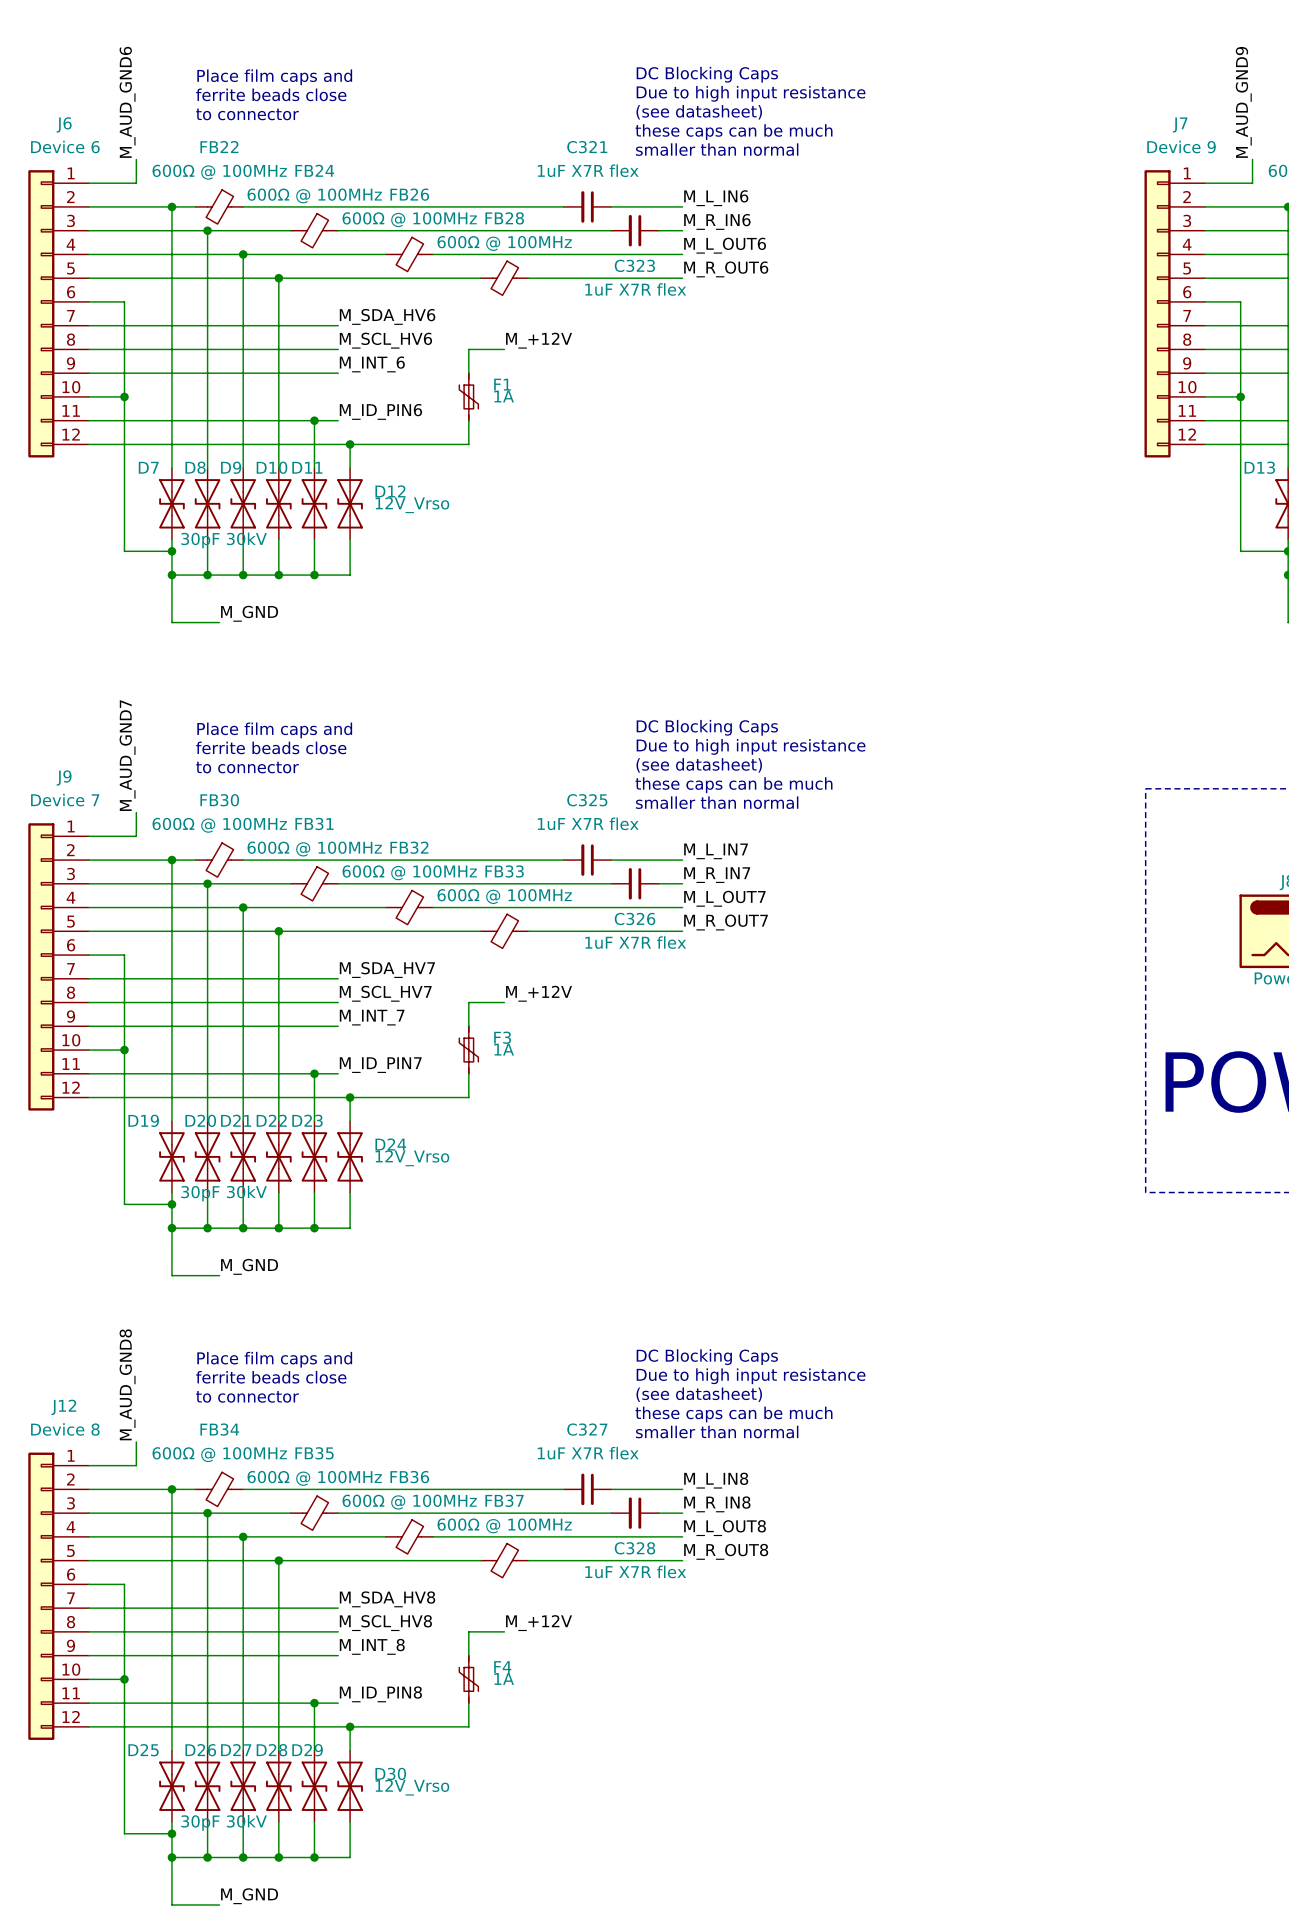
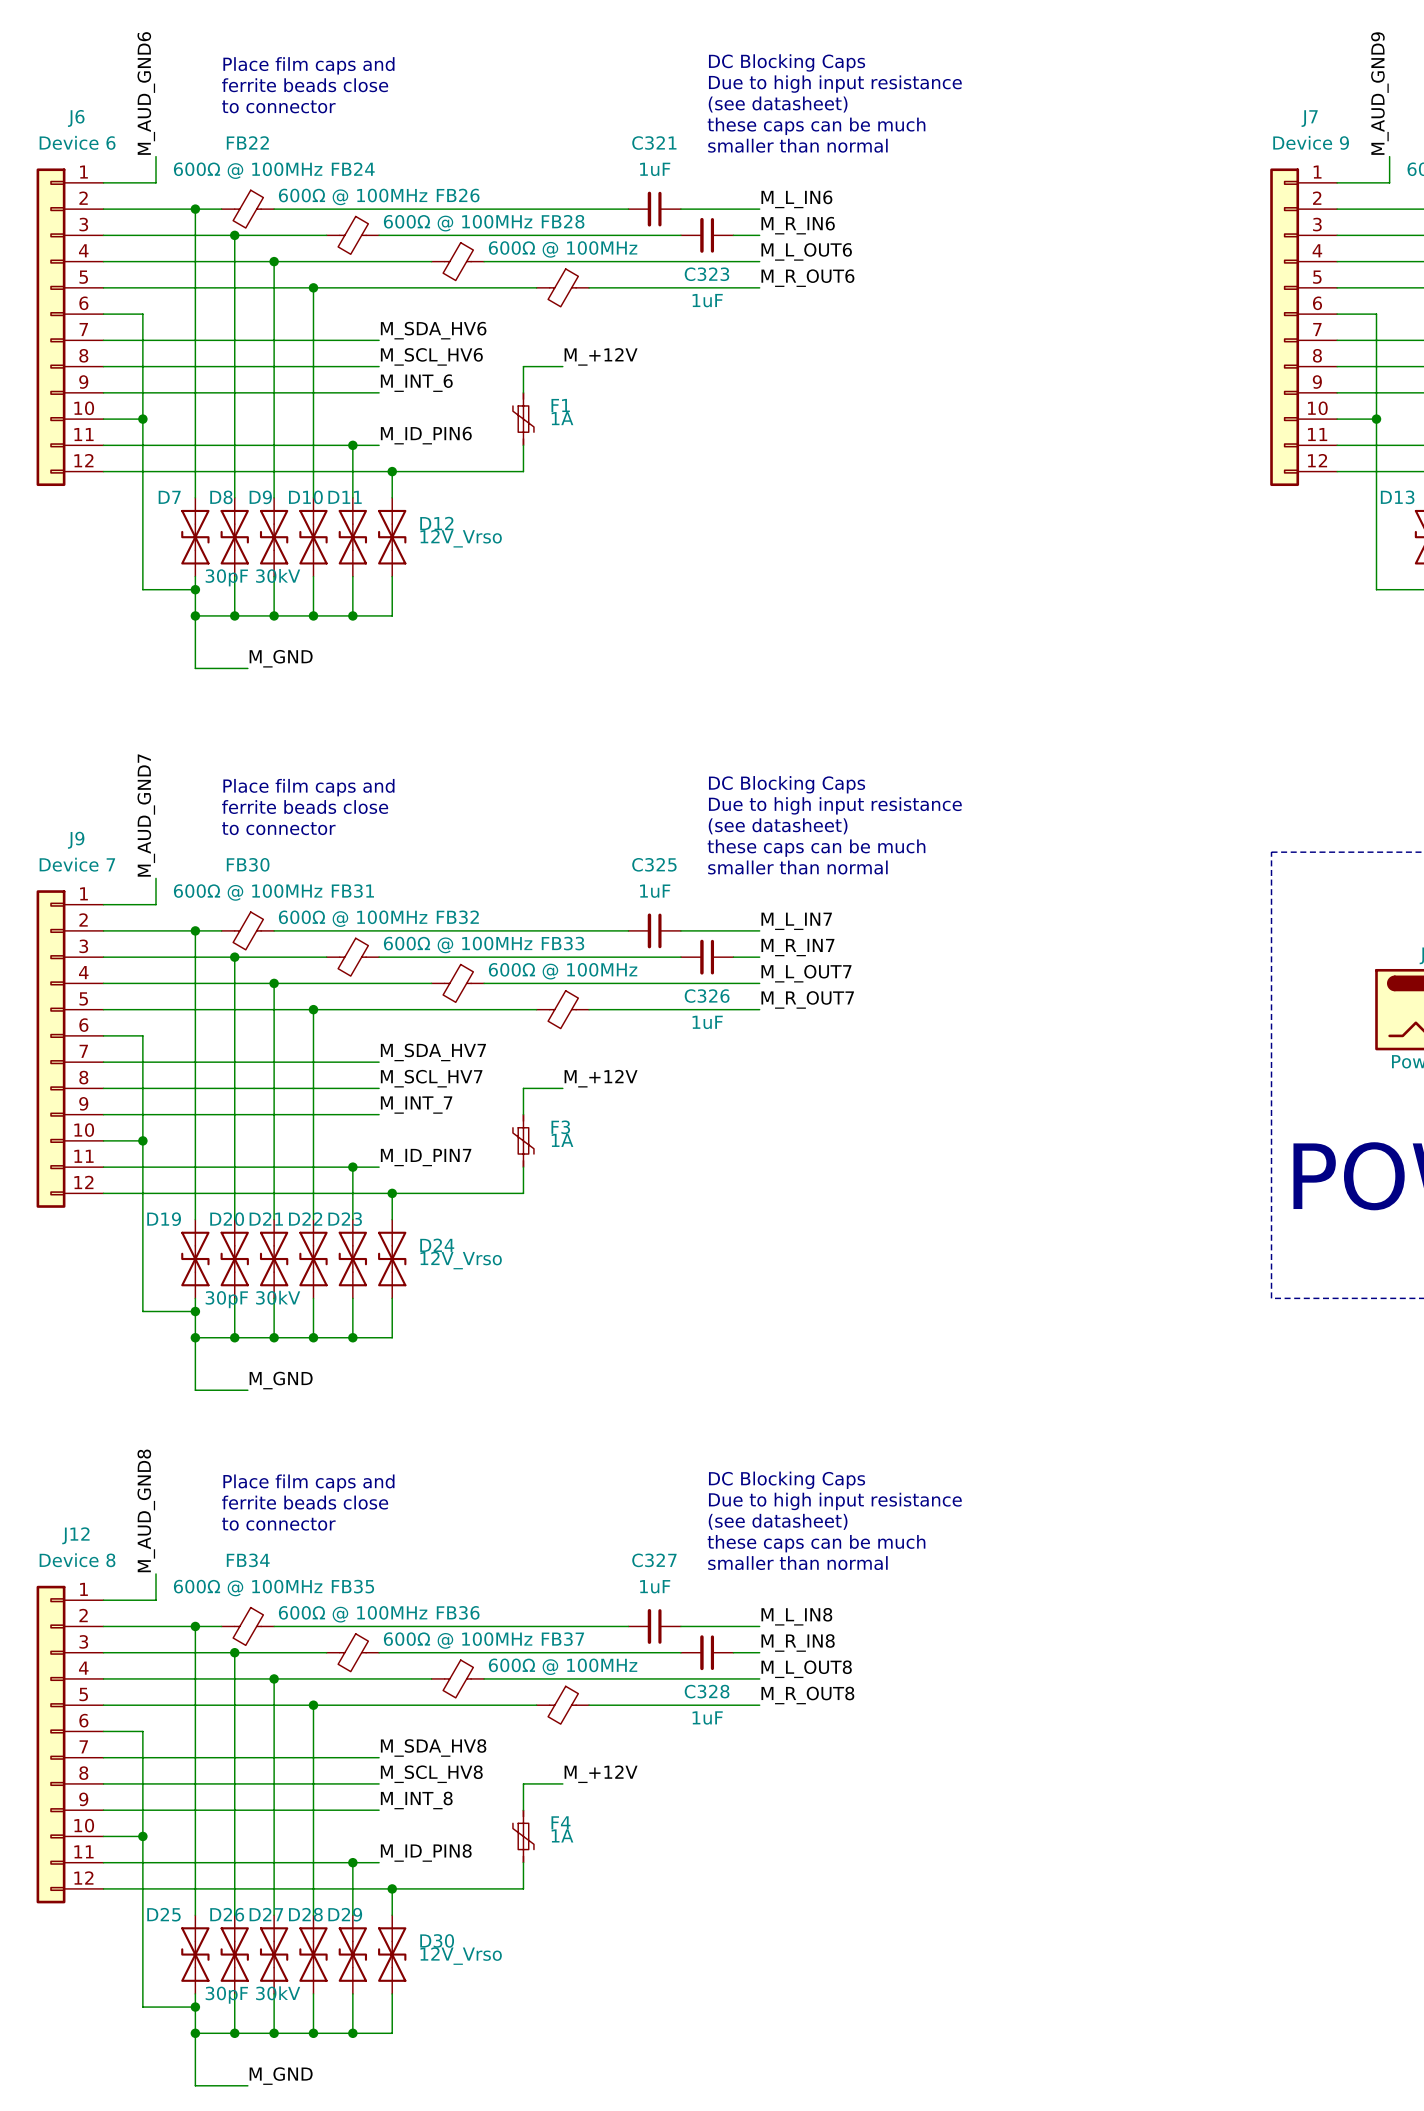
C321 value: 1uF X7R flex (588, 170) -> 1uF (655, 169)
C323 value: 1uF X7R flex (635, 289) -> 1uF (707, 300)
C325 value: 1uF X7R flex (588, 823) -> 1uF (655, 891)
C326 value: 1uF X7R flex (635, 942) -> 1uF (707, 1022)
C327 value: 1uF X7R flex (588, 1453) -> 1uF (655, 1586)
C328 value: 1uF X7R flex (635, 1571) -> 1uF (707, 1717)

